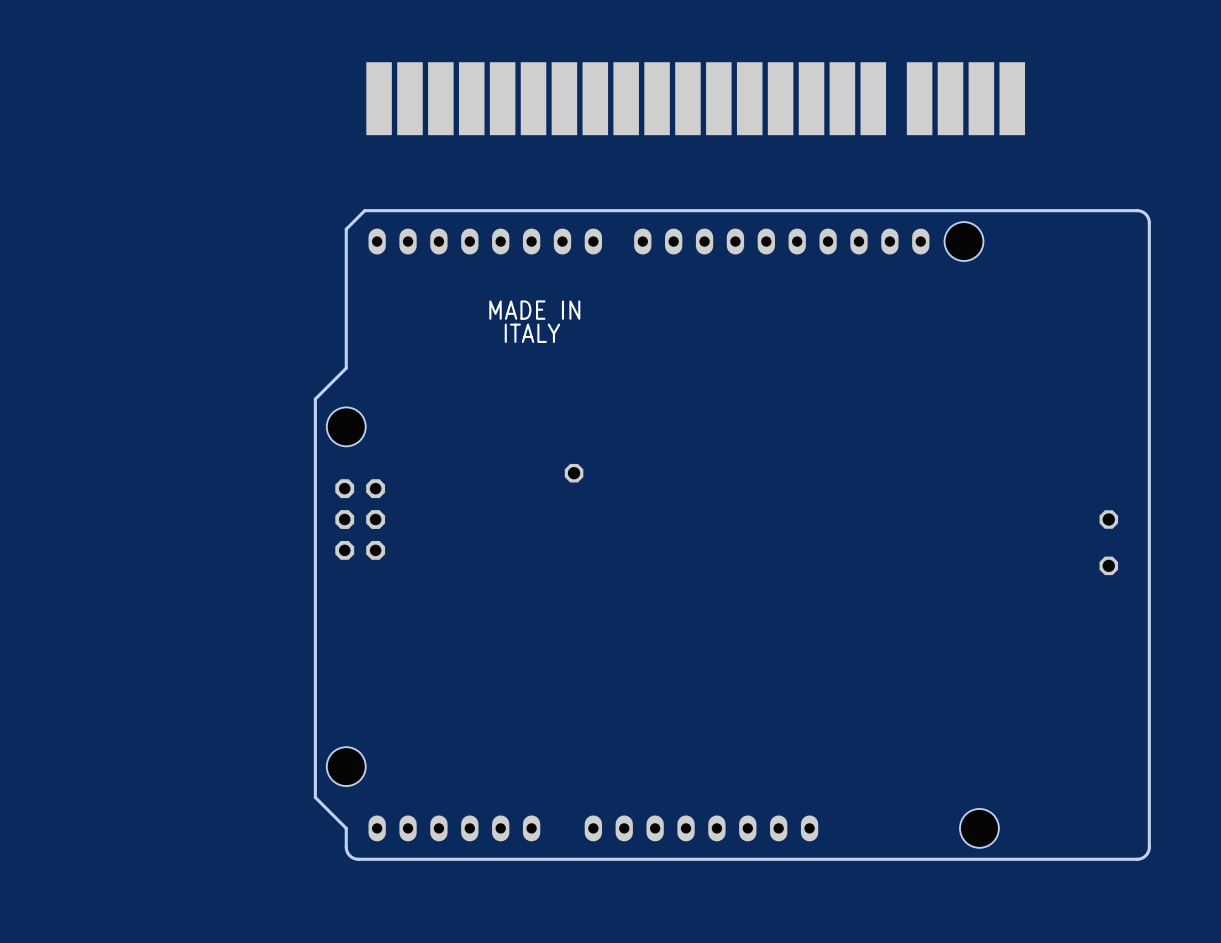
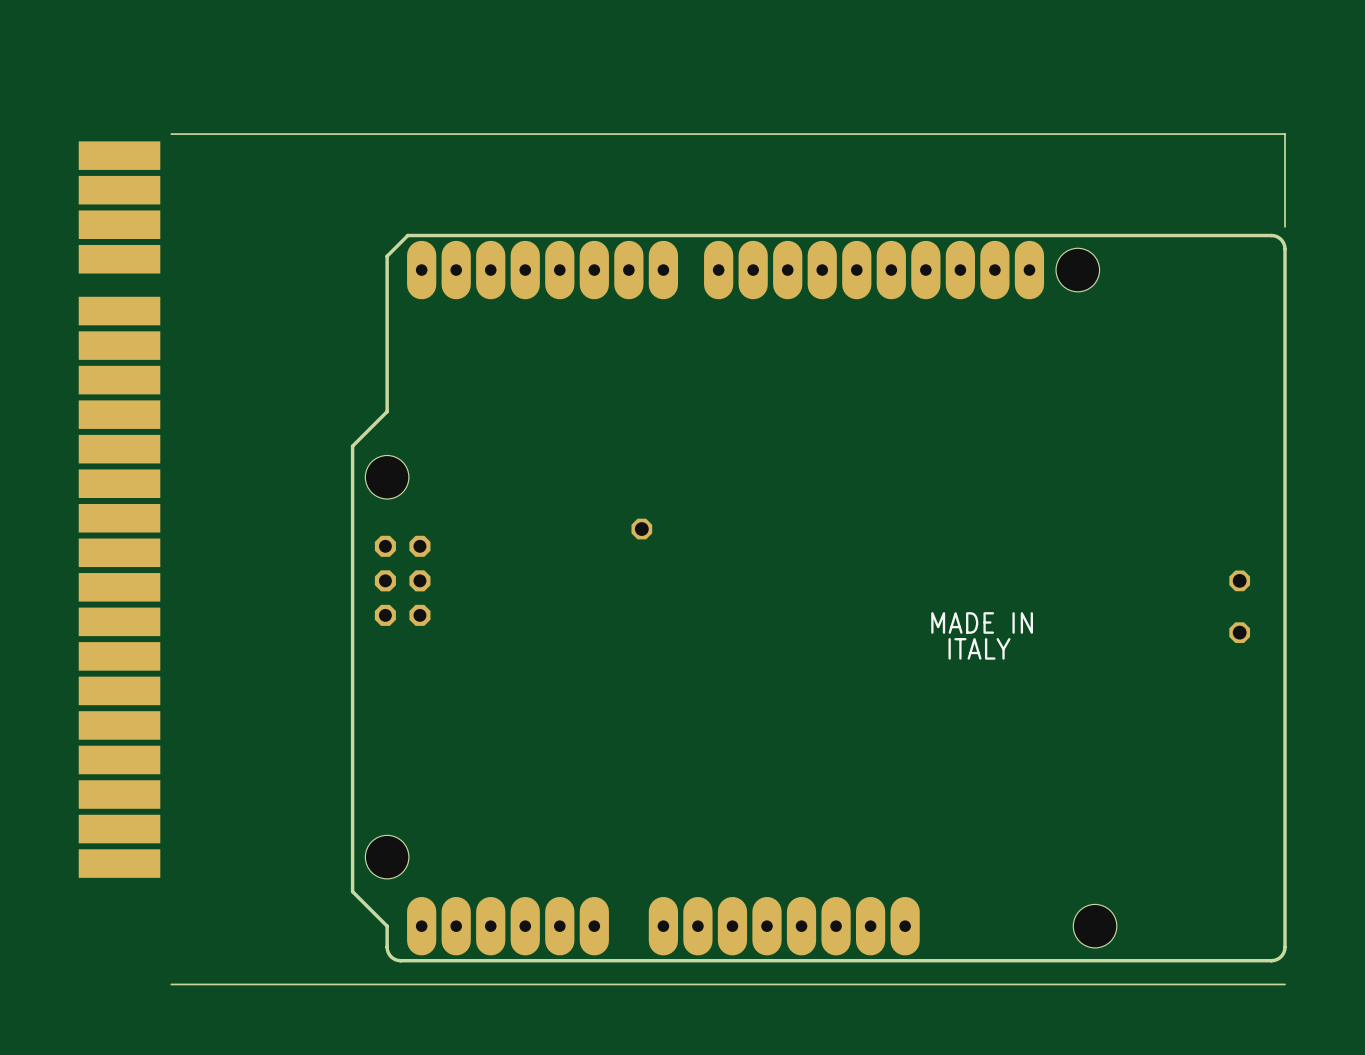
part: (695, 98) -> none
board edge: none -> (171, 134) (1284, 134) (1284, 226)
part footprint: [368, 228, 603, 255] -> [407, 240, 679, 300]
part footprint: [634, 228, 930, 255] -> [704, 240, 1045, 300]
text: MADE IN (534, 310) -> none
text: ITALY (532, 333) -> none
part: none -> (119, 509)
text: none -> MADE IN (982, 622)
text: none -> ITALY (979, 648)
part footprint: [368, 815, 541, 842] -> [407, 896, 609, 956]
part footprint: [584, 815, 819, 842] -> [648, 896, 920, 956]
board edge: none -> (1284, 984) (171, 984)

